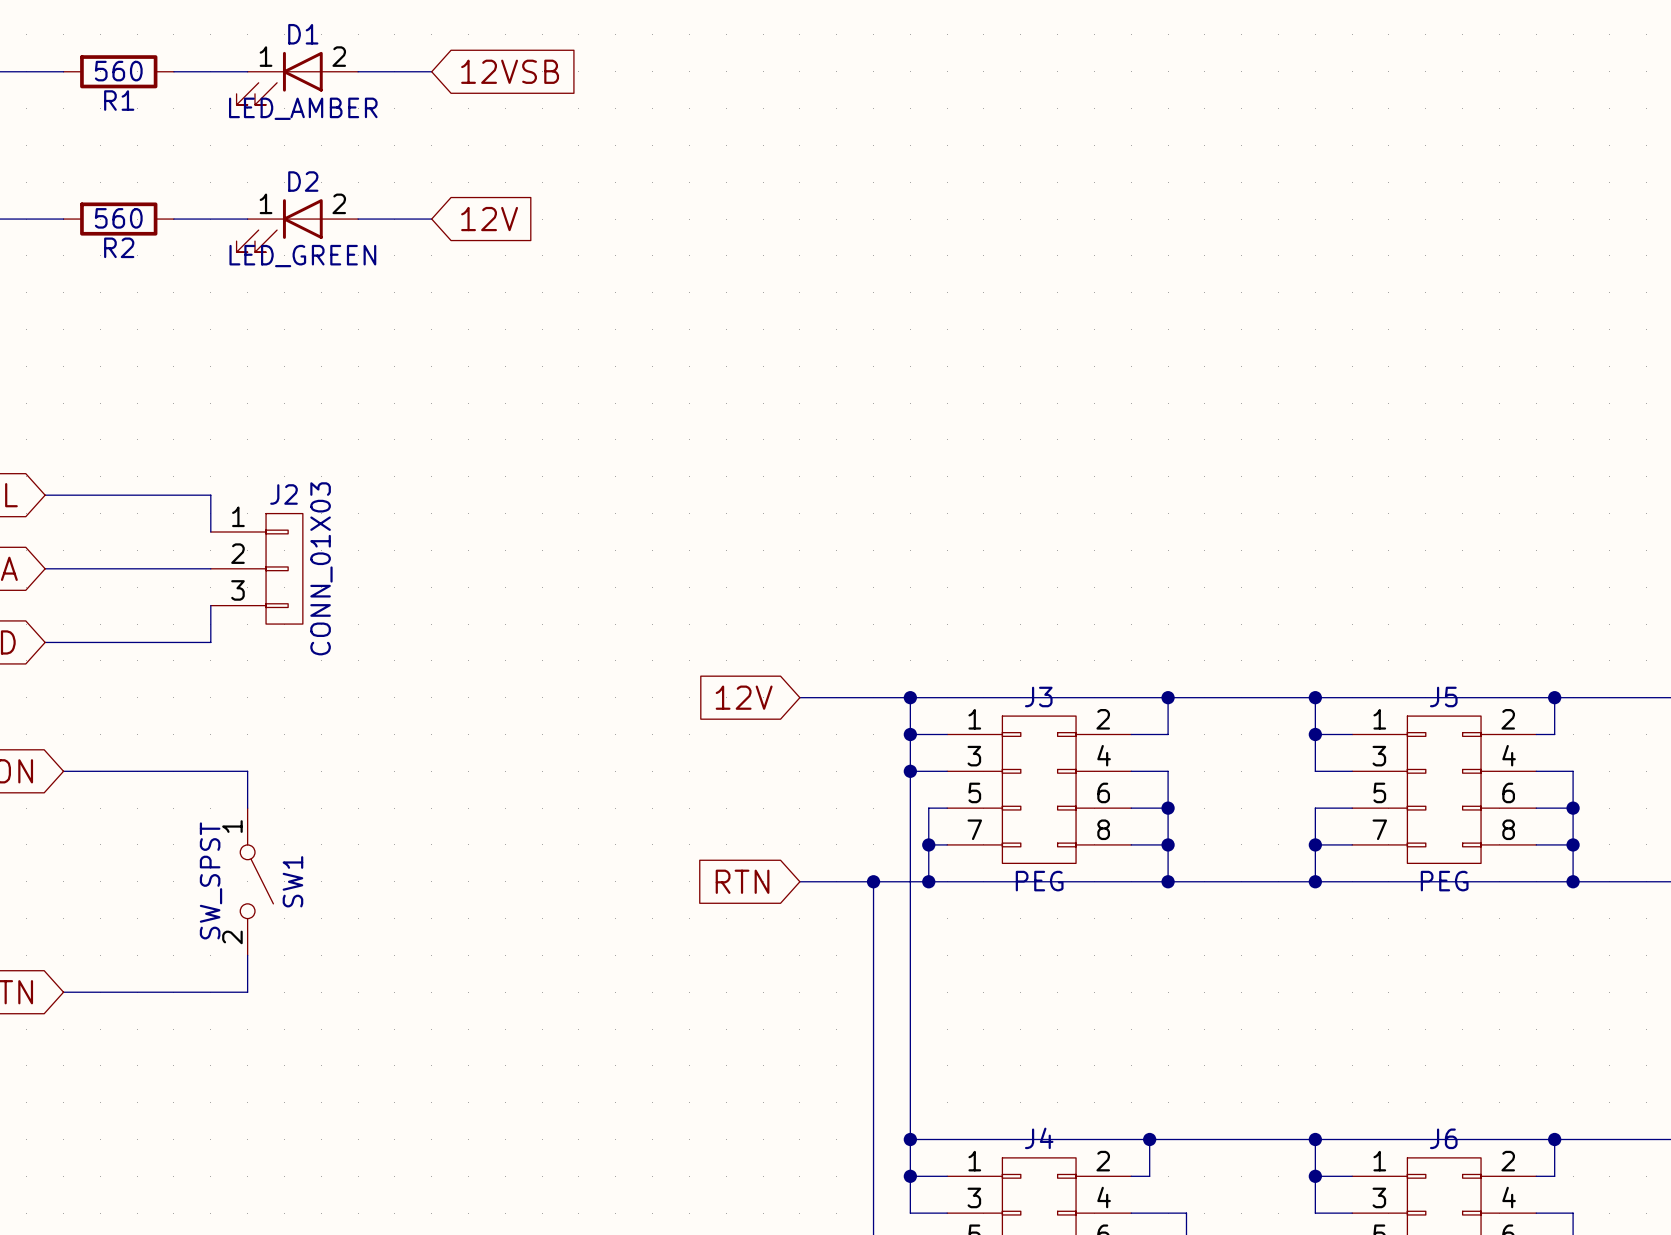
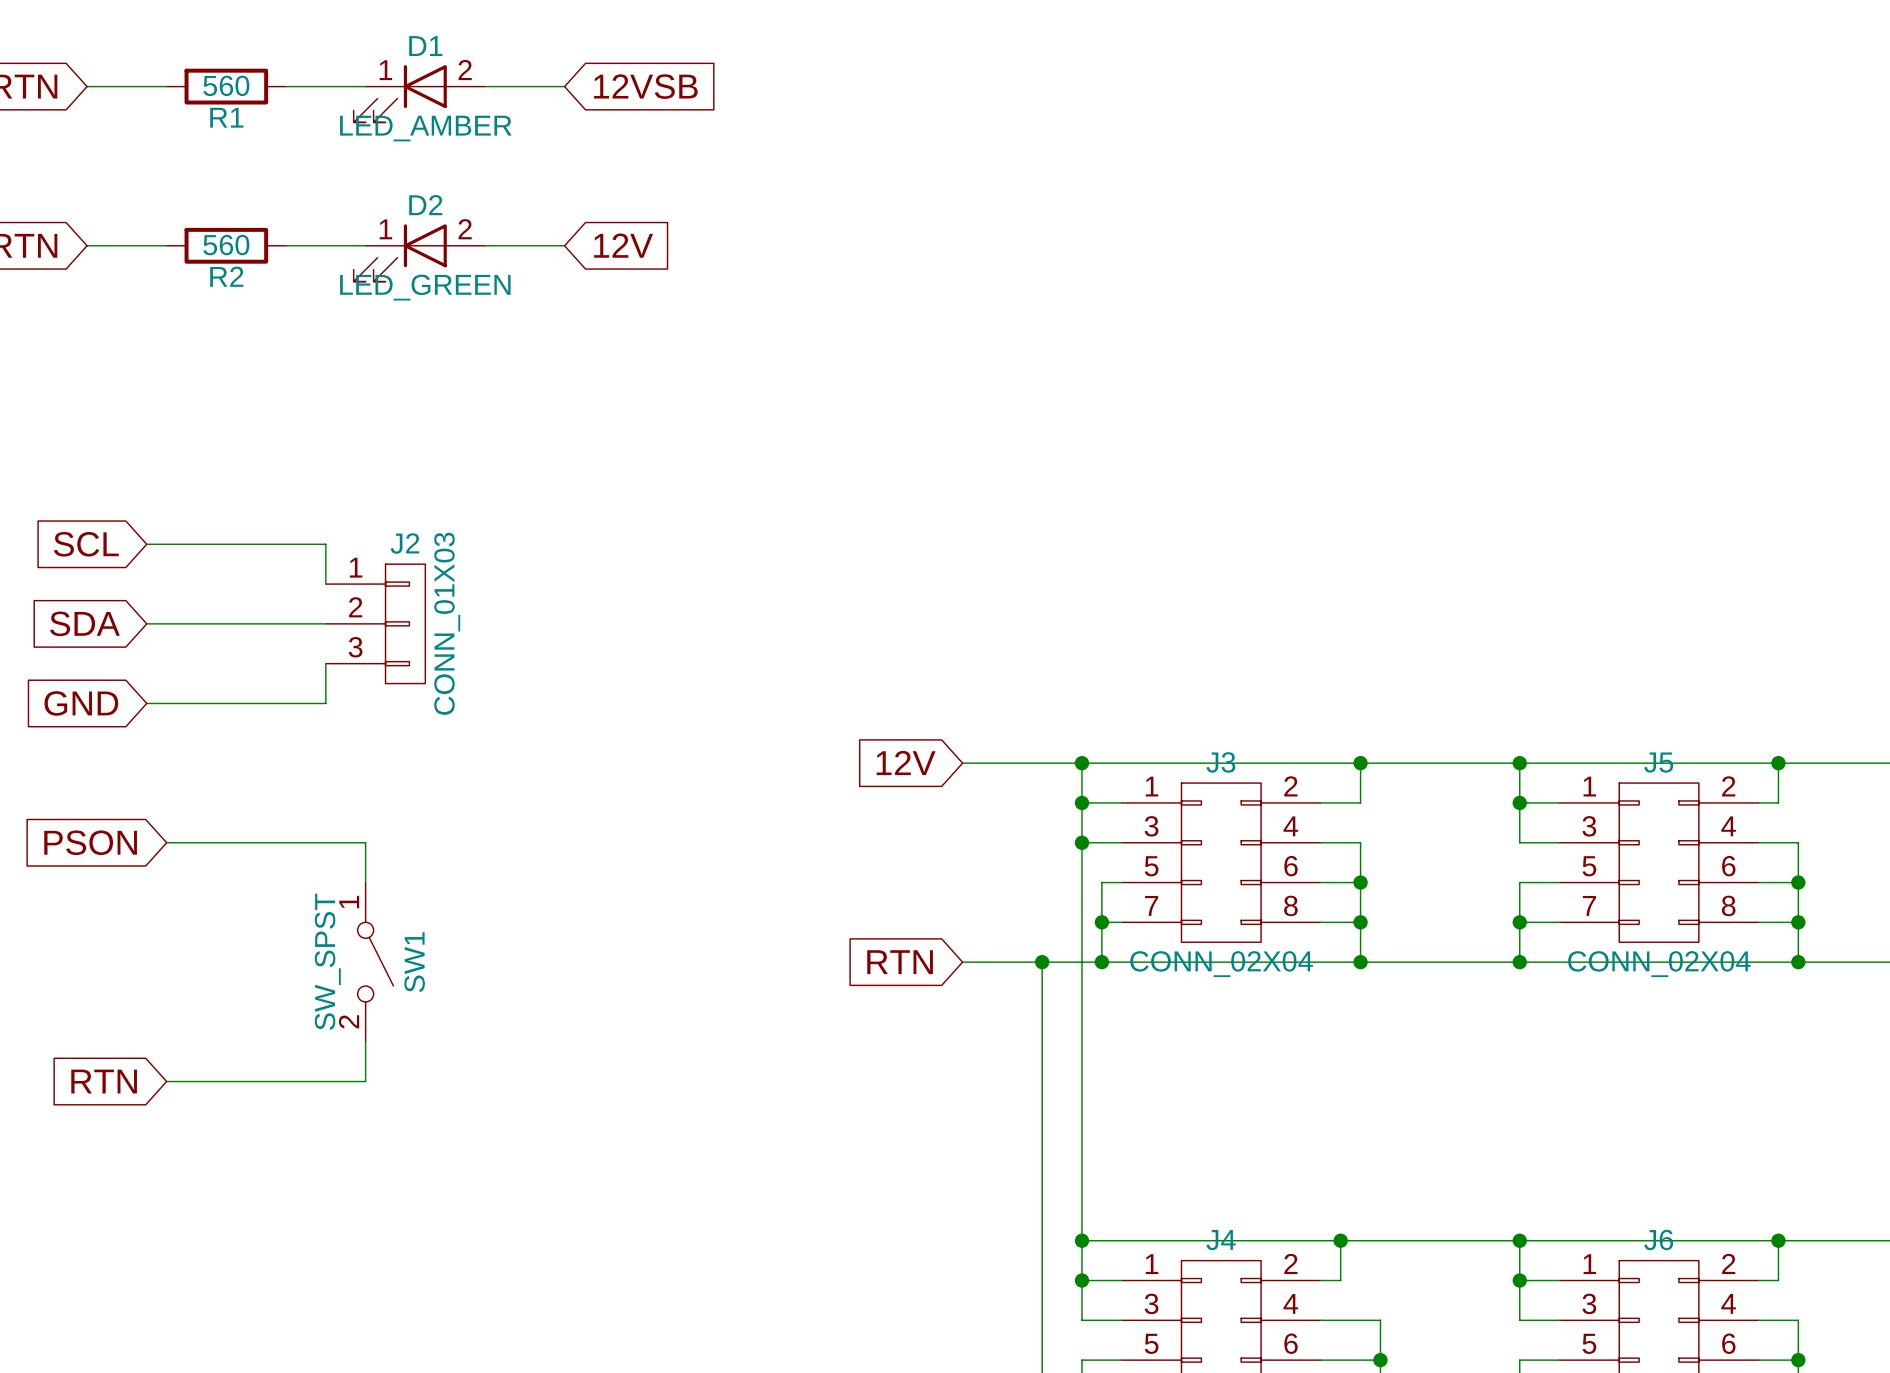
J3 value: PEG (1039, 881) -> CONN_02X04 (1221, 964)
J5 value: PEG (1444, 881) -> CONN_02X04 (1659, 964)

